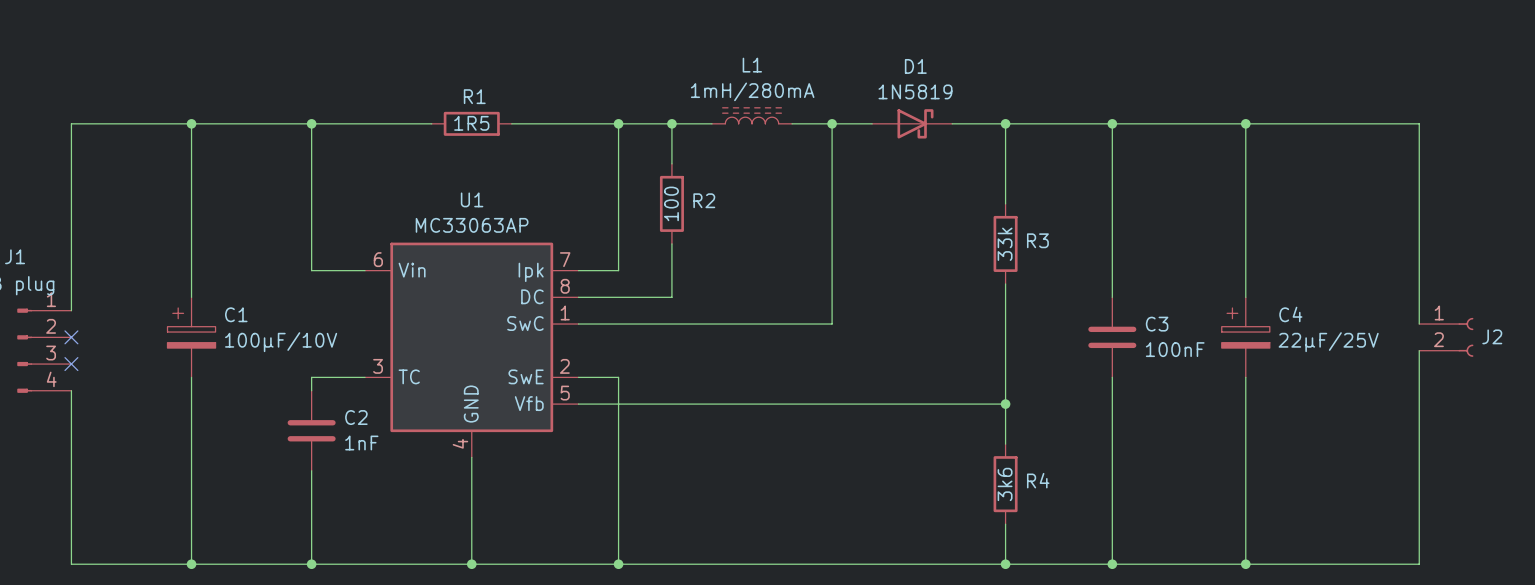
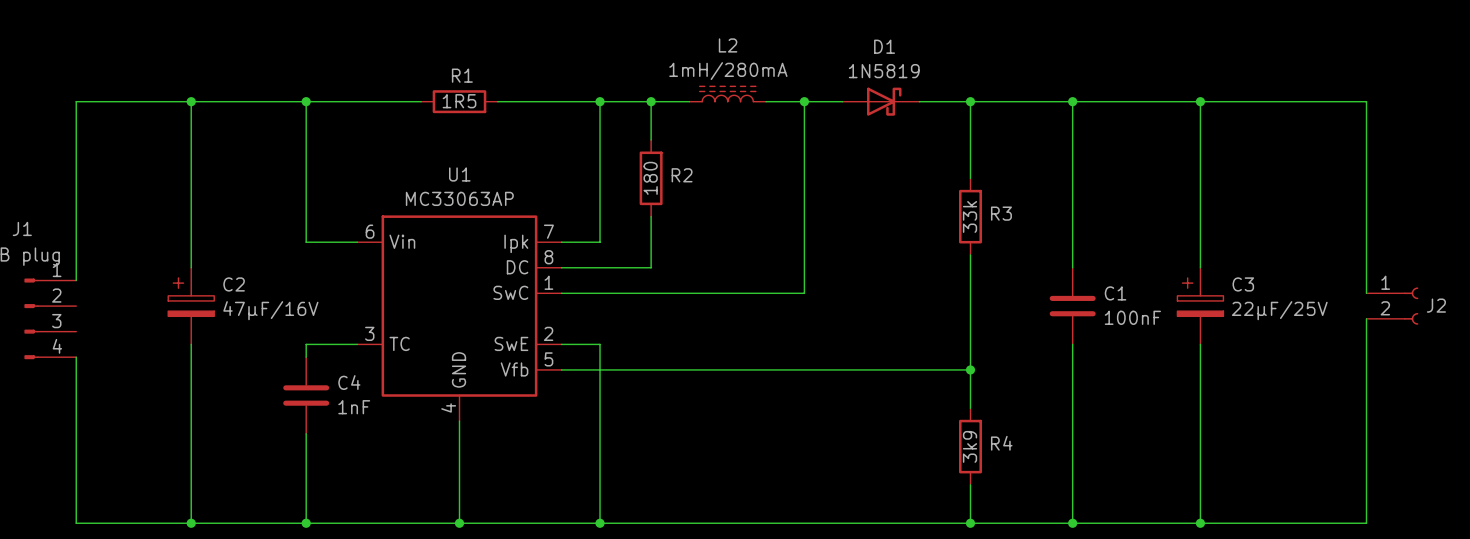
L1 name: L1 (752, 65) -> L2 (728, 45)
R2 value: 100 (671, 203) -> 180 (650, 178)
C1 name: C1 (236, 314) -> C2 (234, 284)
C4 name: C4 (1290, 314) -> C3 (1243, 284)
C3 name: C3 (1157, 324) -> C1 (1115, 293)
no-connect mark: (71, 337) -> none
C1 value: 100μF/10V (281, 342) -> 47μF/16V (270, 310)
no-connect mark: (71, 364) -> none
C2 name: C2 (356, 417) -> C4 (349, 382)
R4 value: 3k6 (1005, 484) -> 3k9 (970, 446)

